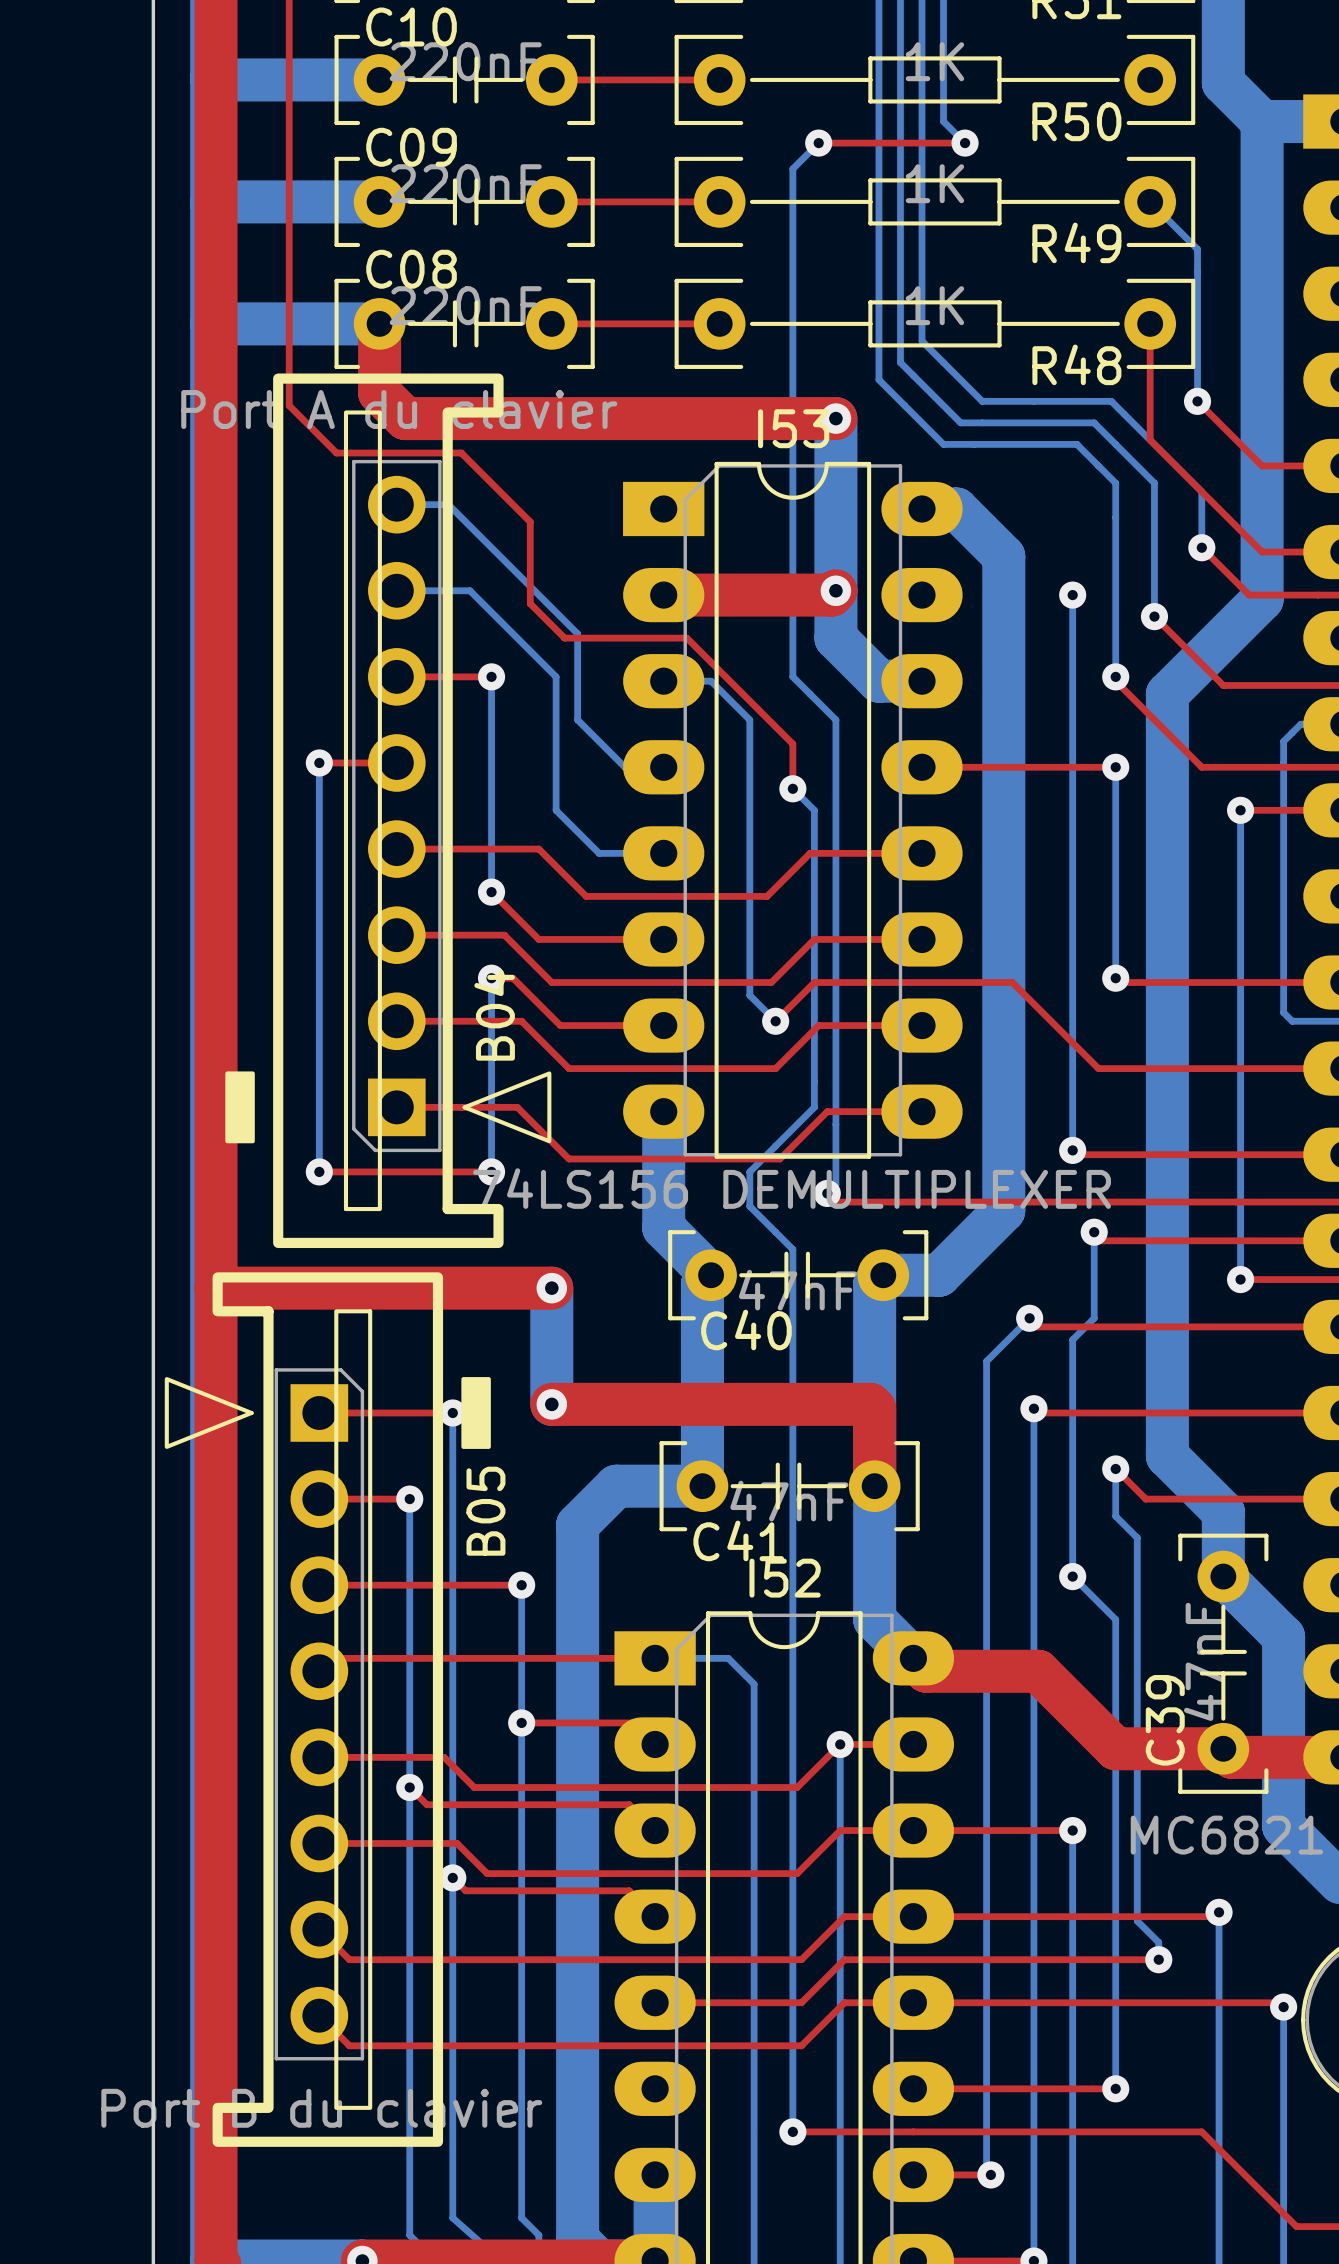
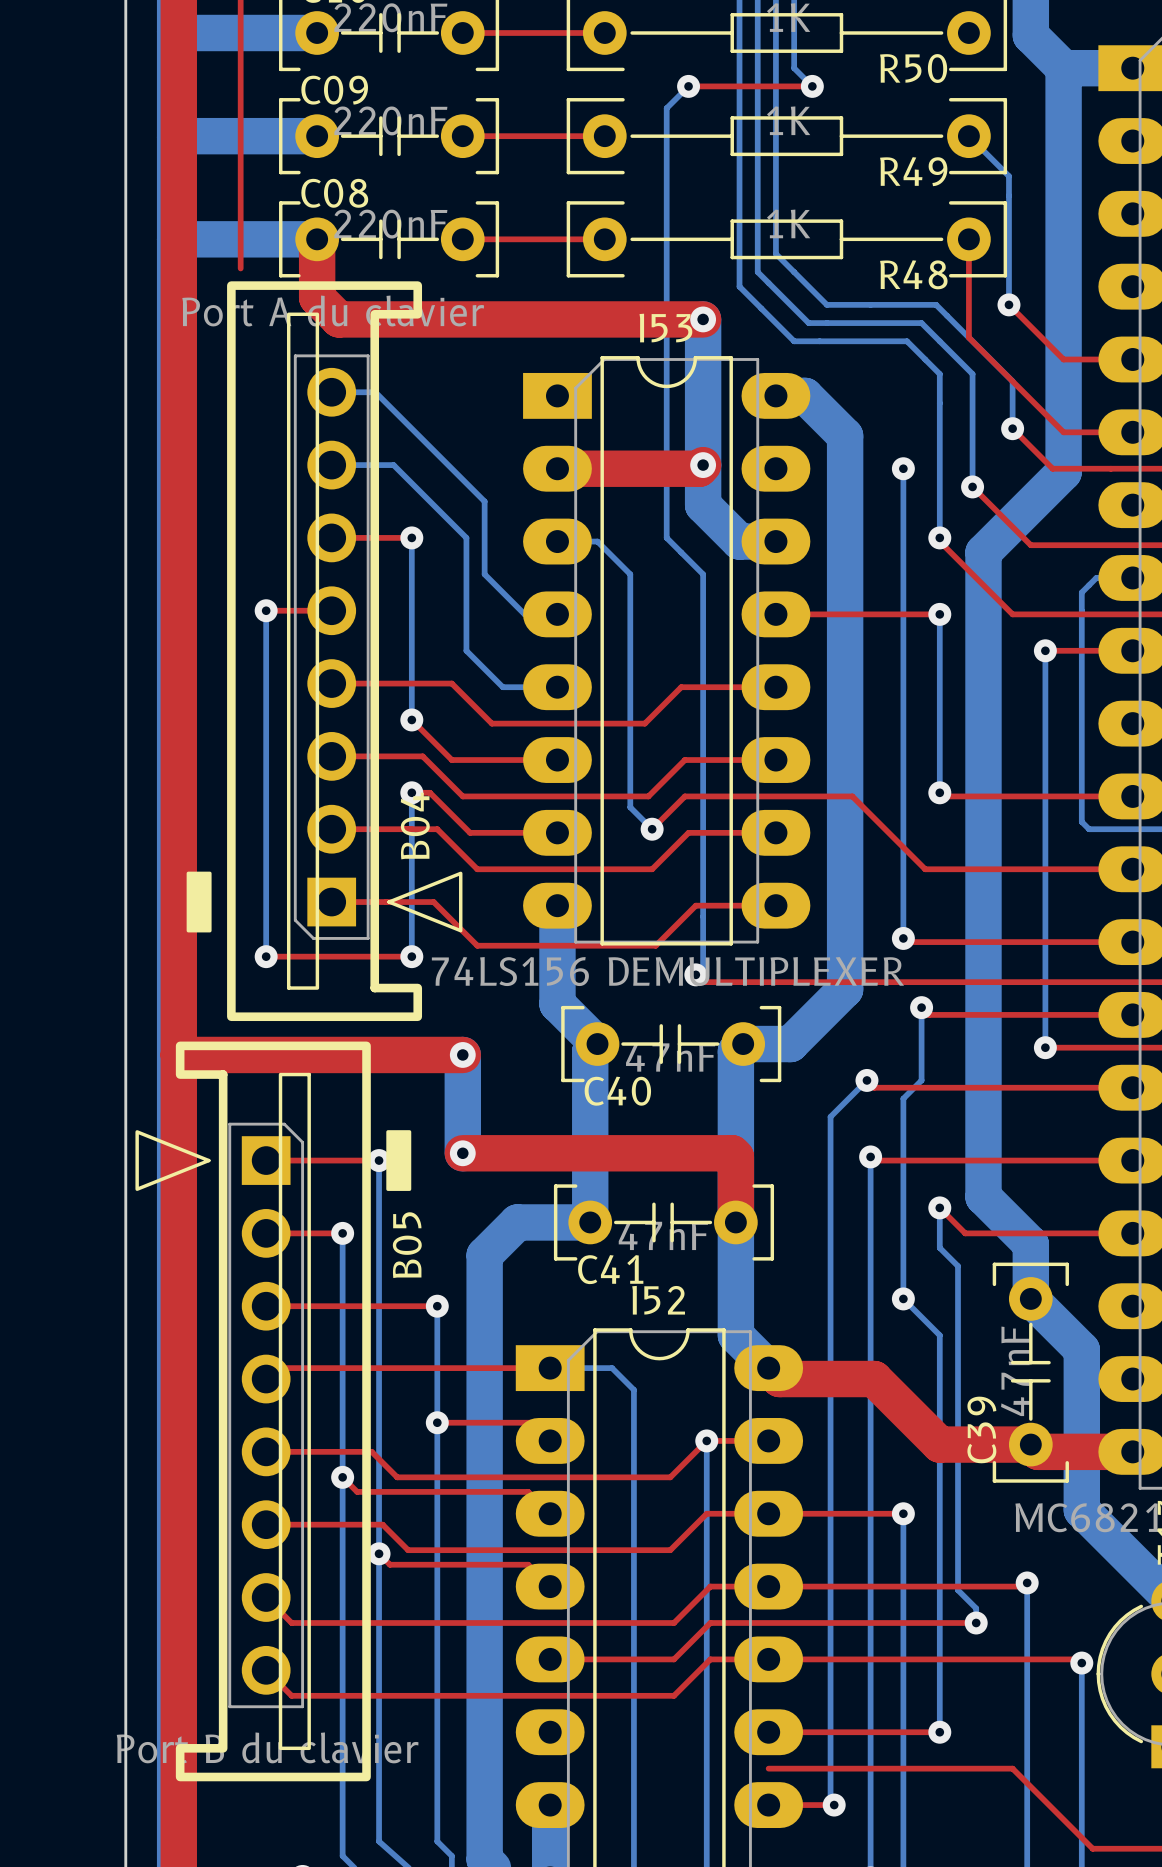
top track: (289, 358) (289, 405) (336, 453) (461, 453) (530, 521) (530, 603) (564, 638) (686, 638) (792, 744) (792, 788) -> none
bottom track: (792, 788) (814, 810) (814, 1107) (749, 1171) (749, 1206) (792, 1249) (792, 2131) -> none
via: (792, 788) -> none
top track: (792, 2131) (913, 2131) -> none
via: (792, 2131) -> none

